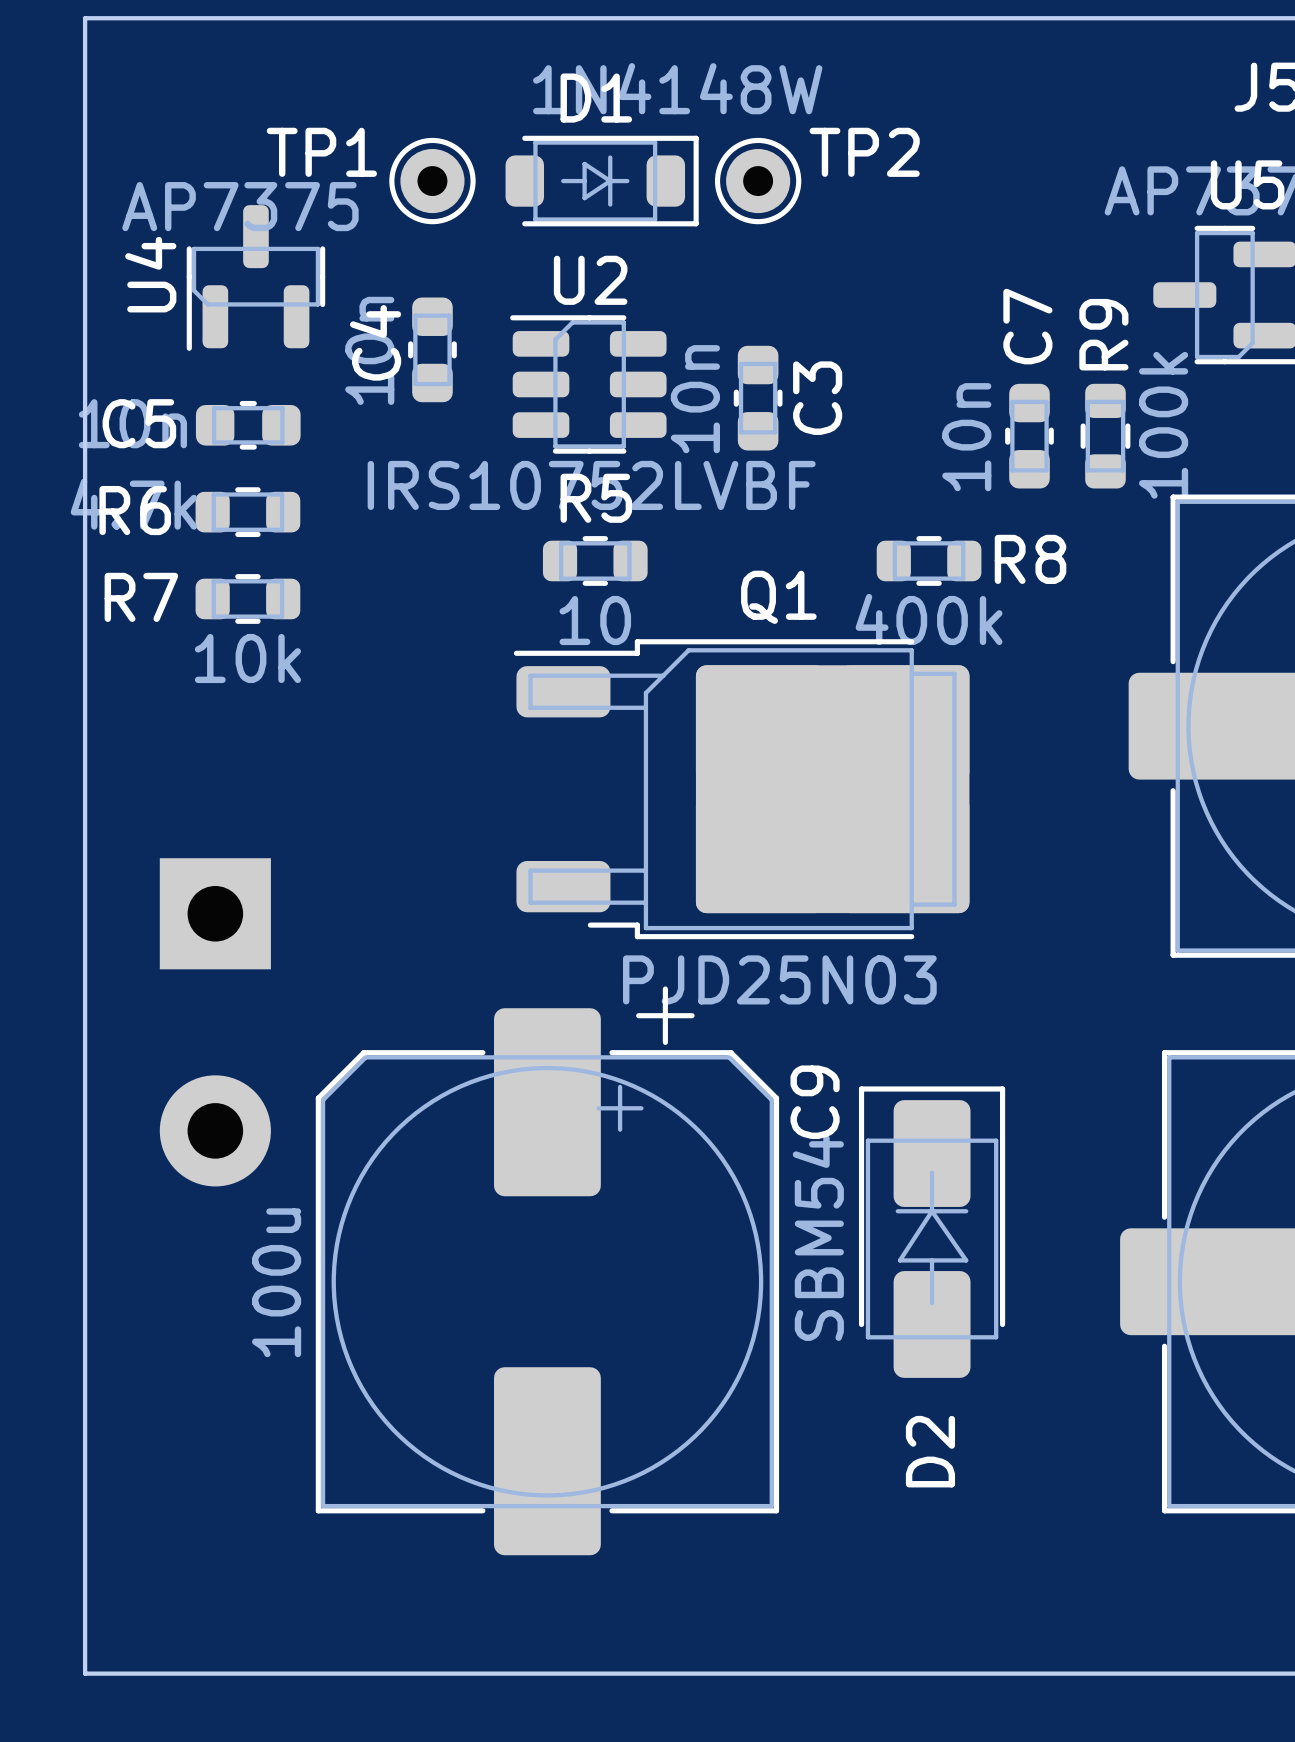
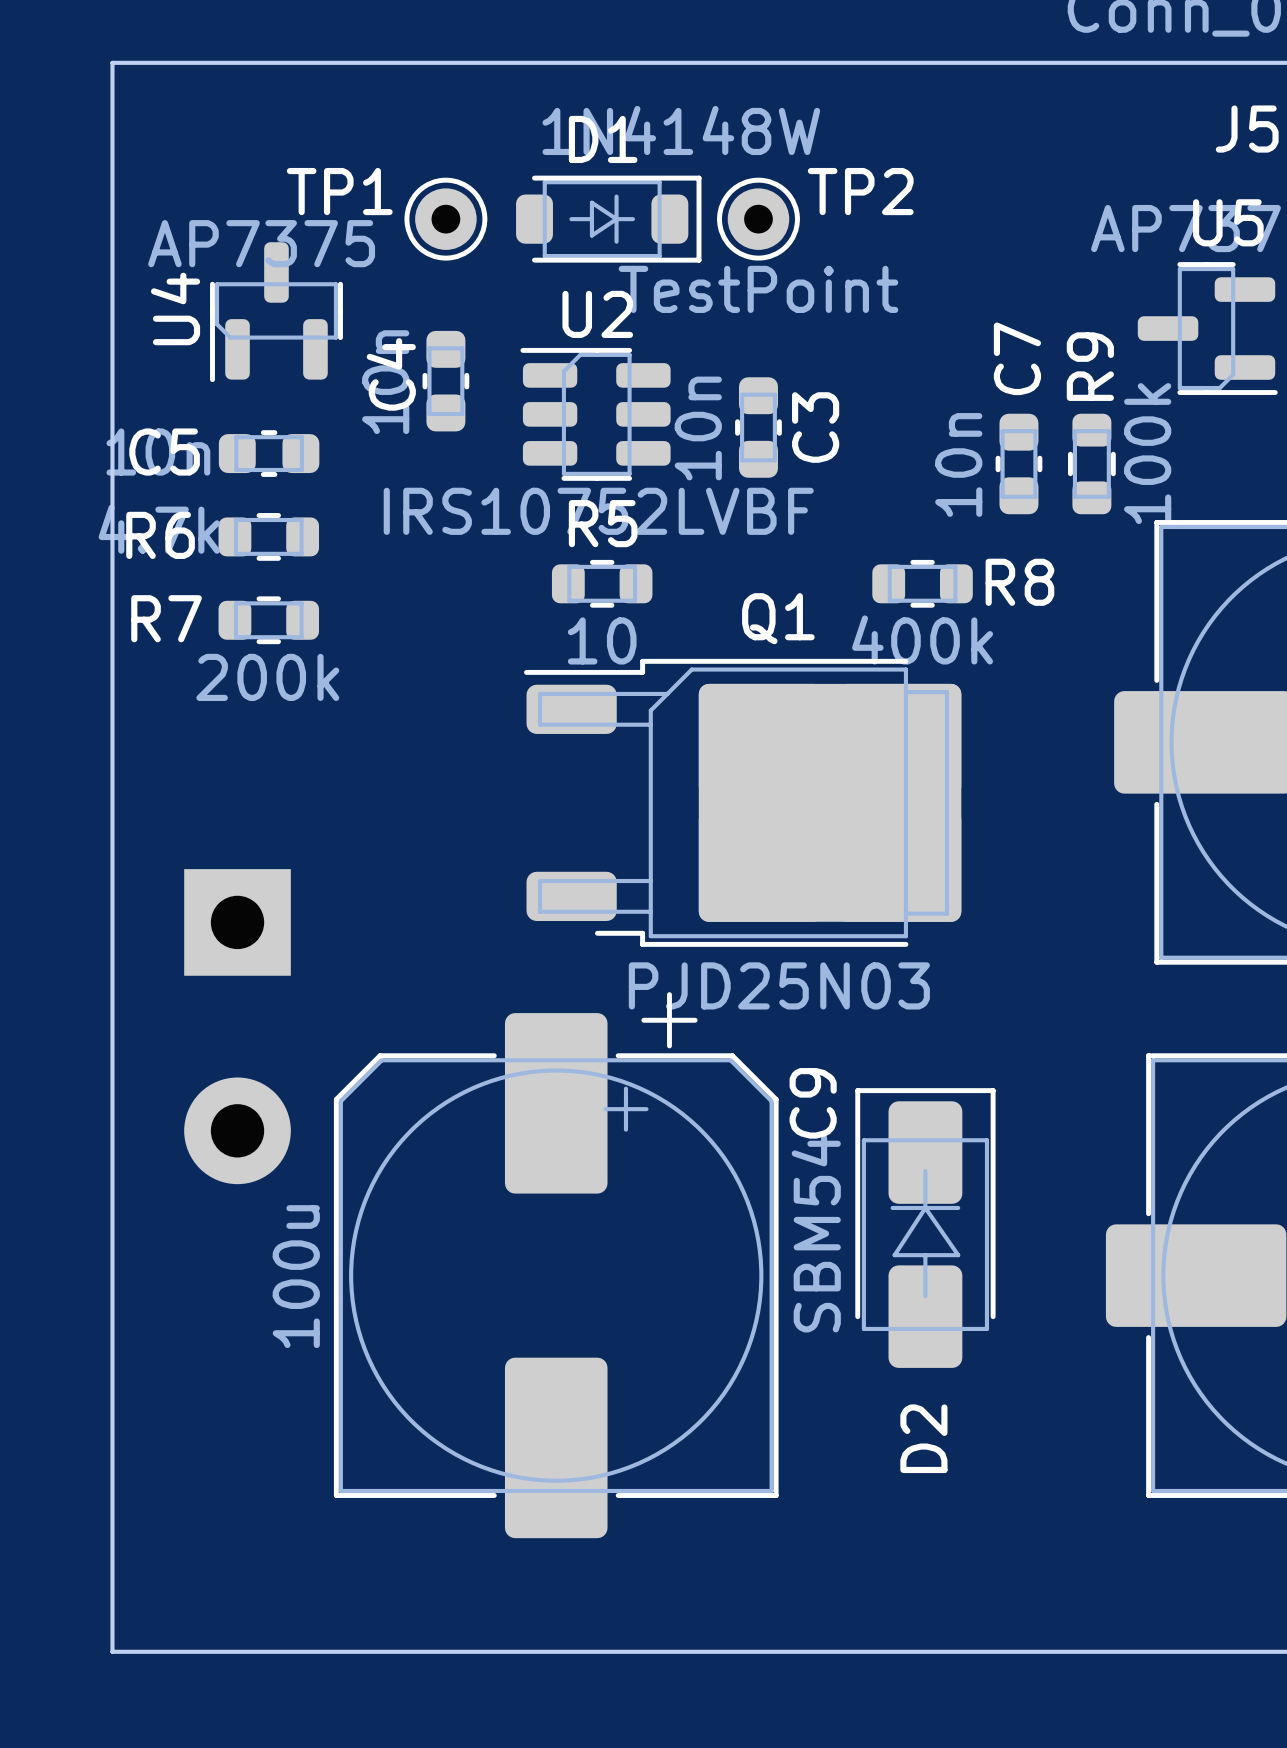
TP2 value: none -> TestPoint (758, 289)
R7 value: 10k (247, 658) -> 200k (267, 677)

